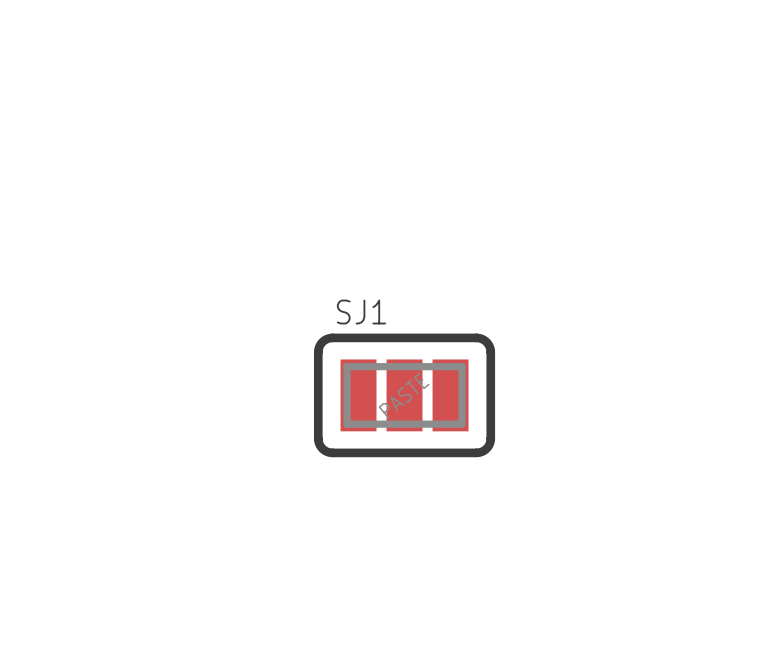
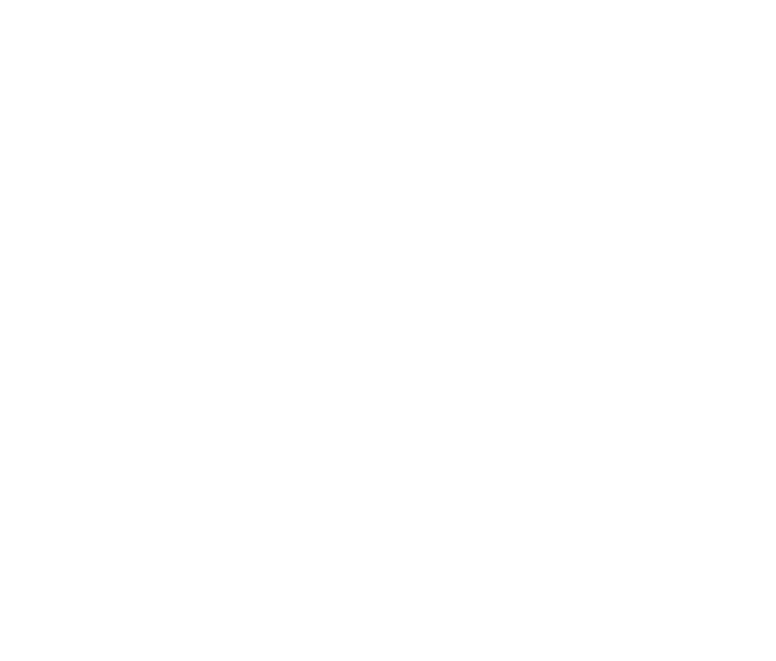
SJ1: (404, 395) -> none

